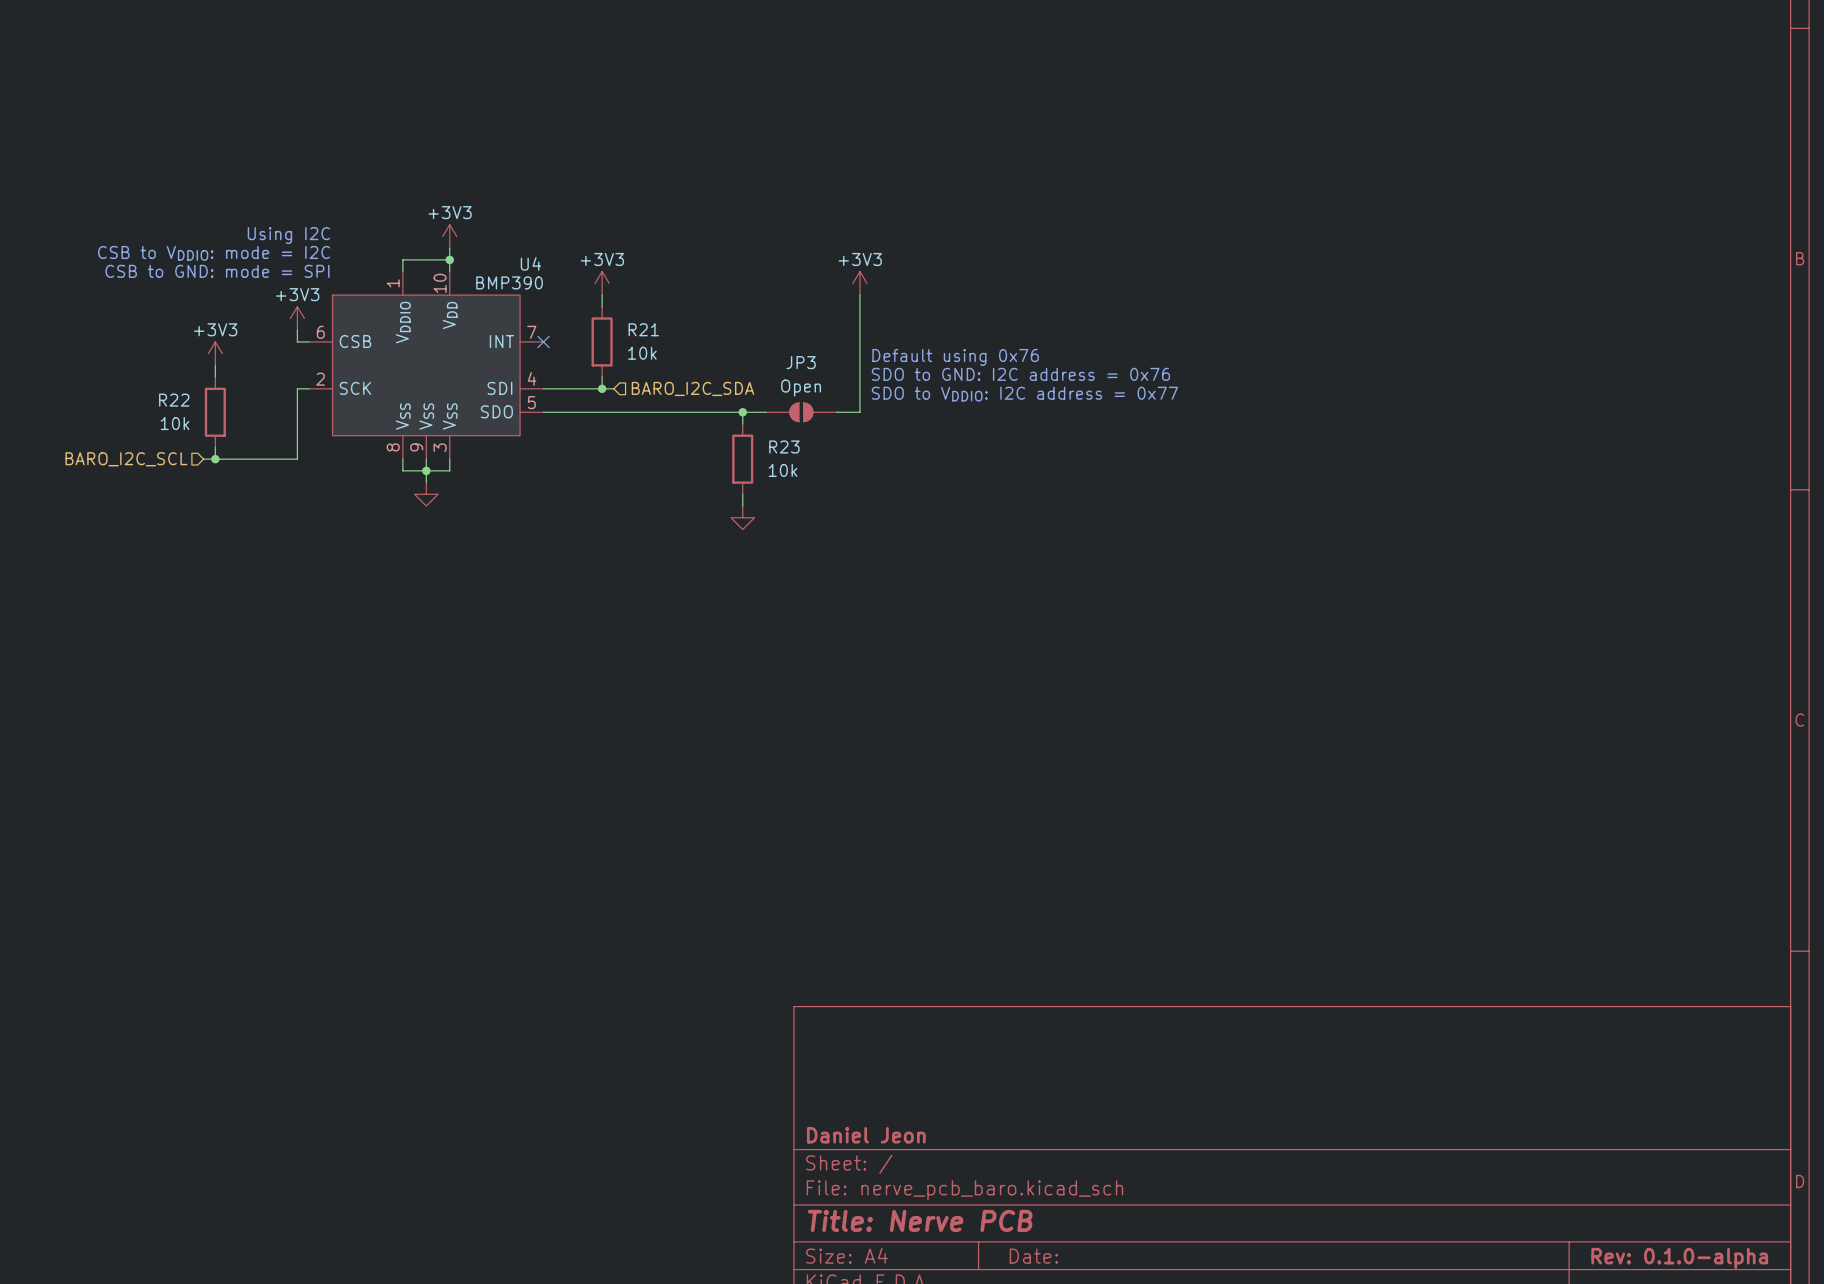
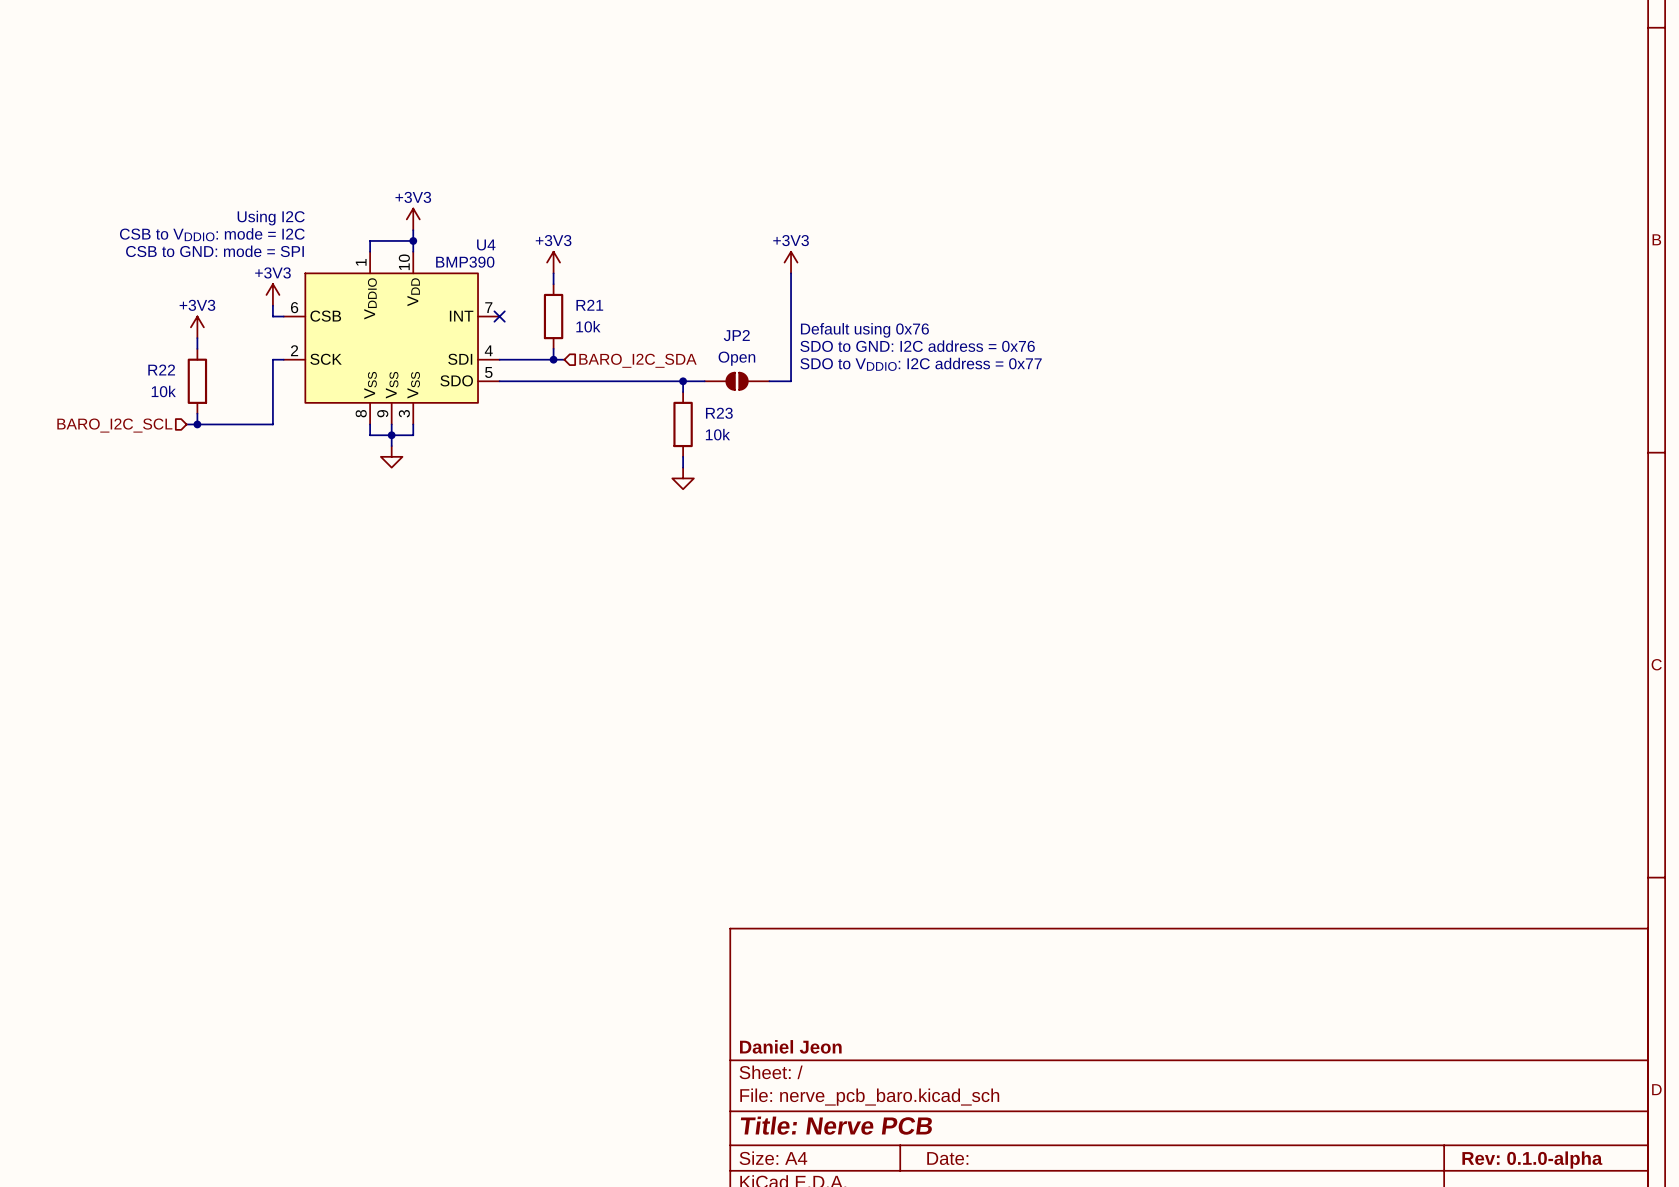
JP3 name: JP3 (801, 362) -> JP2 (736, 335)

